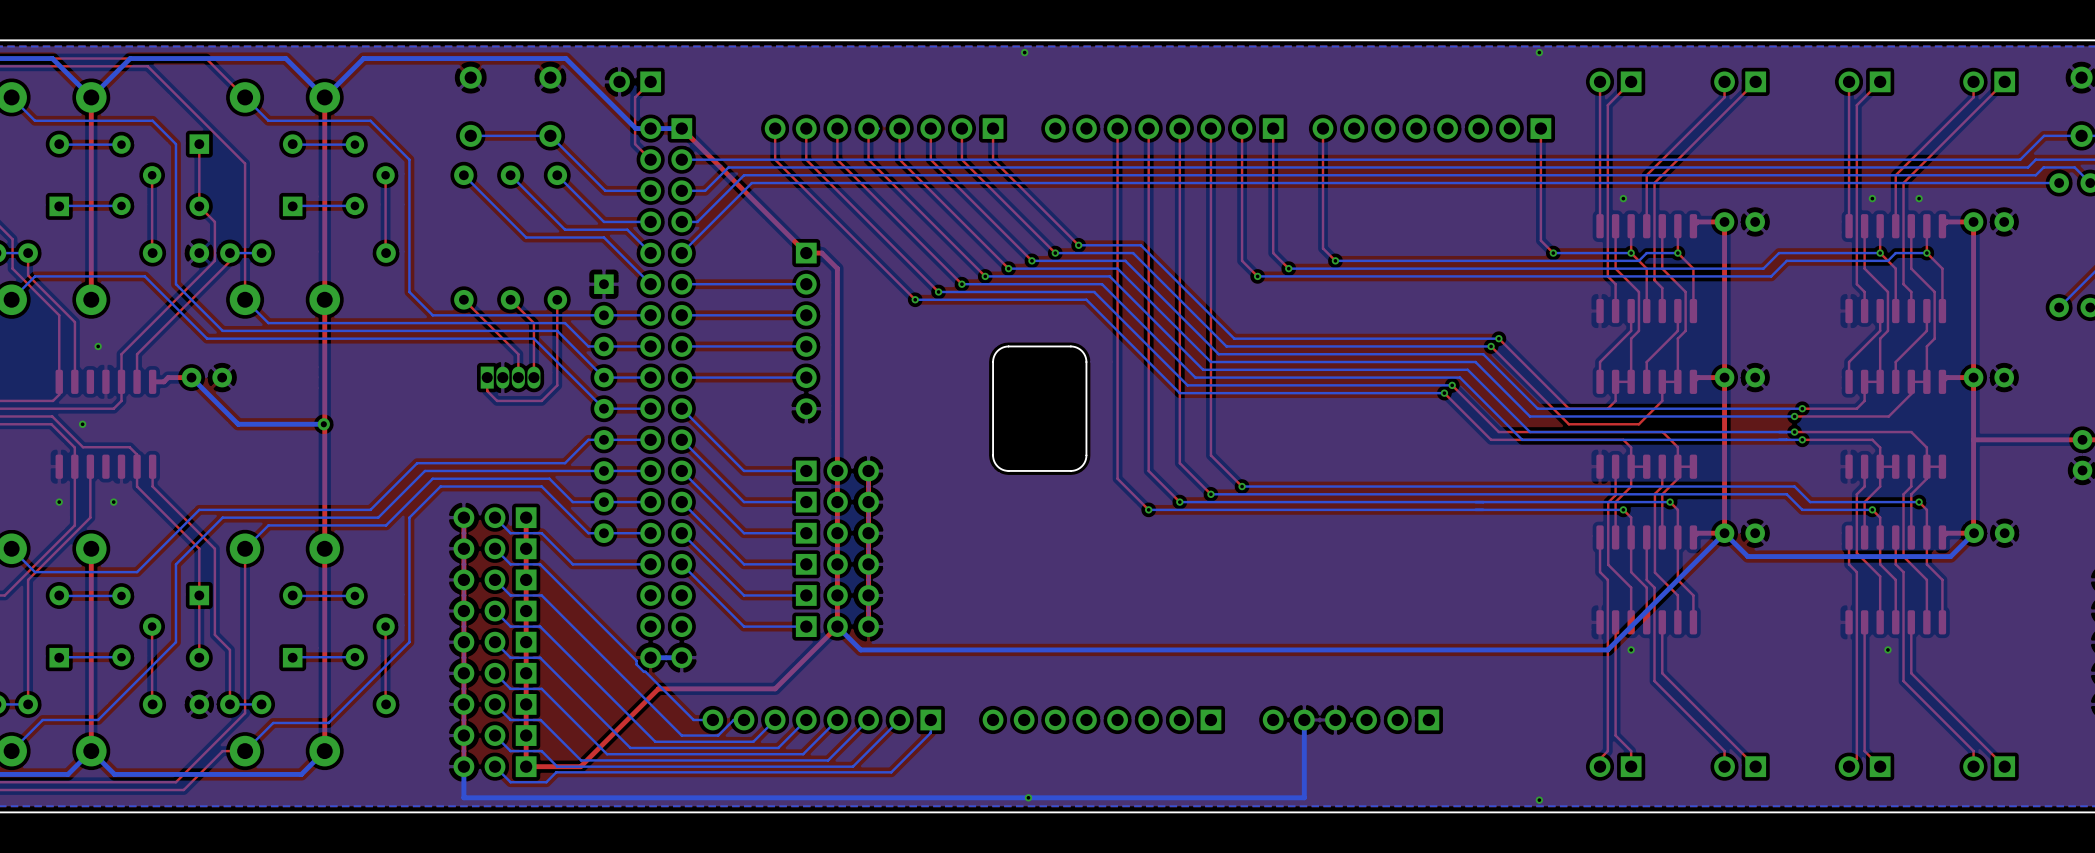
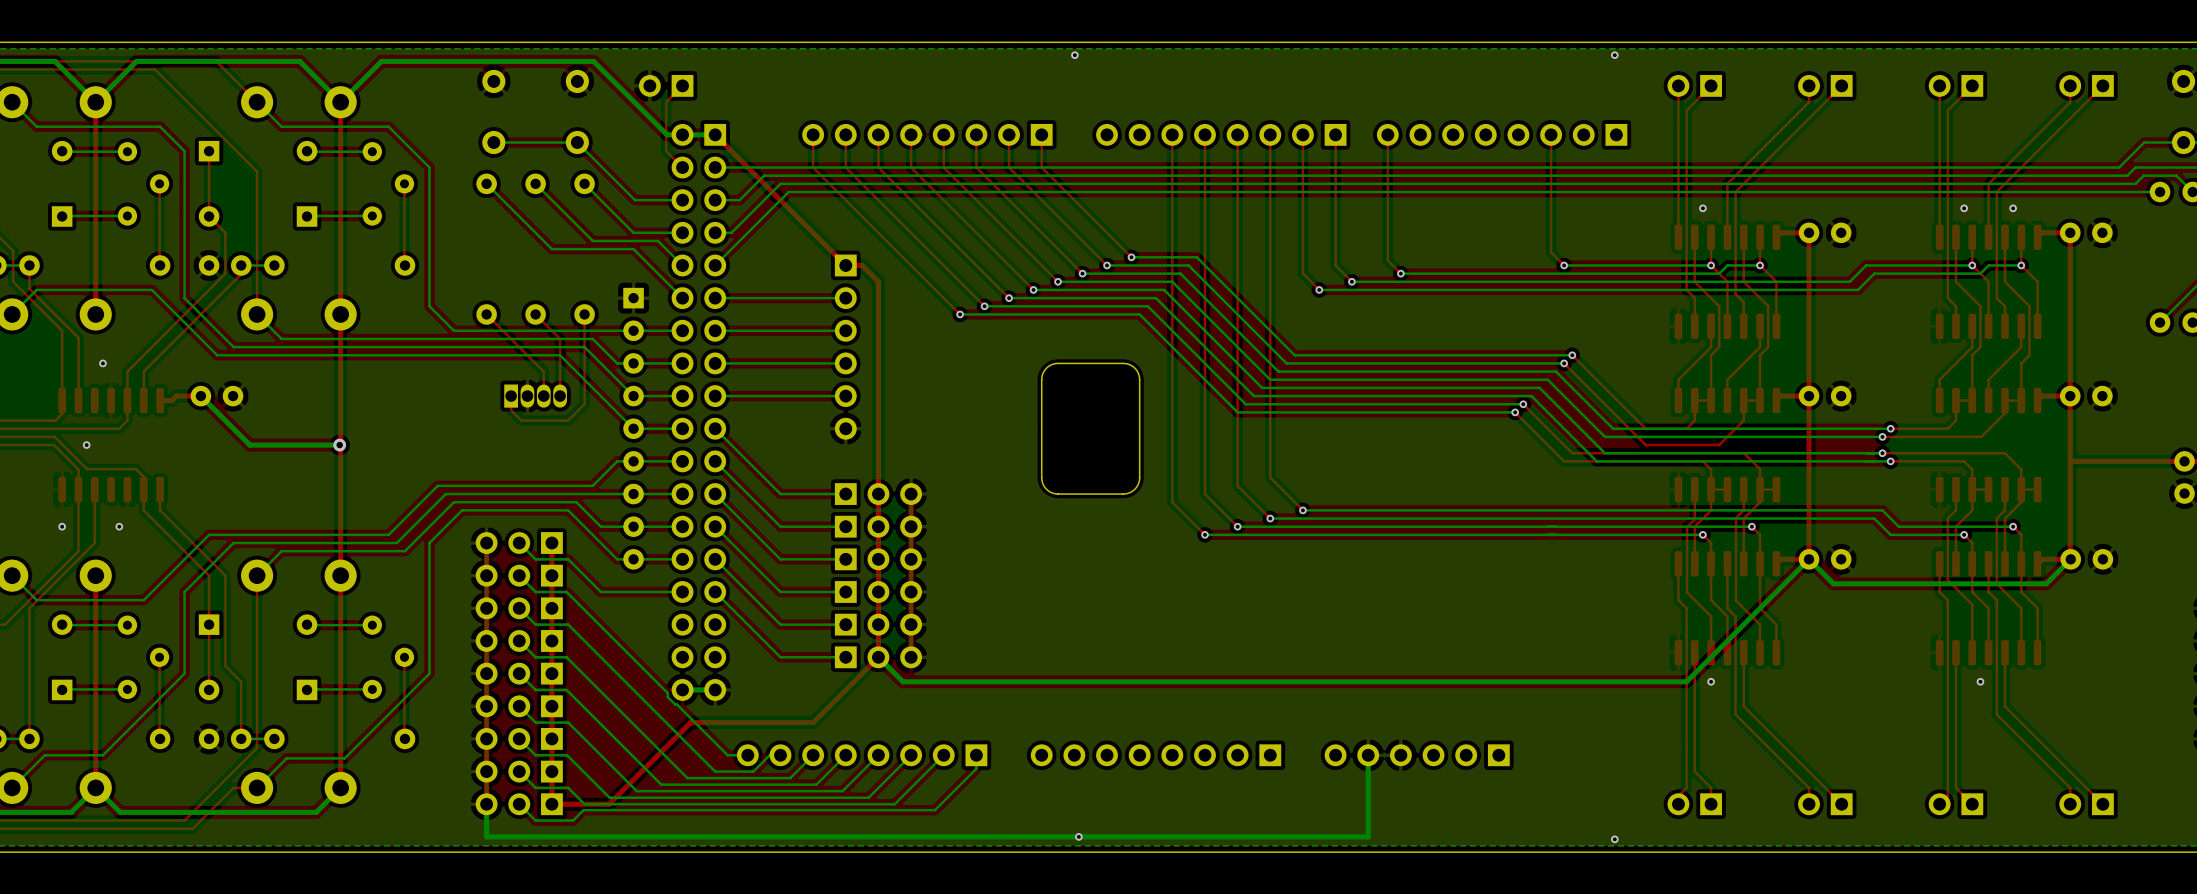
top track: (1540, 128) (1540, 240) (1553, 253) -> (1551, 134) (1551, 252) (1564, 265)
bottom track: none -> (1629, 265) (1564, 265)
via position: (1553, 253) -> (1564, 265)

